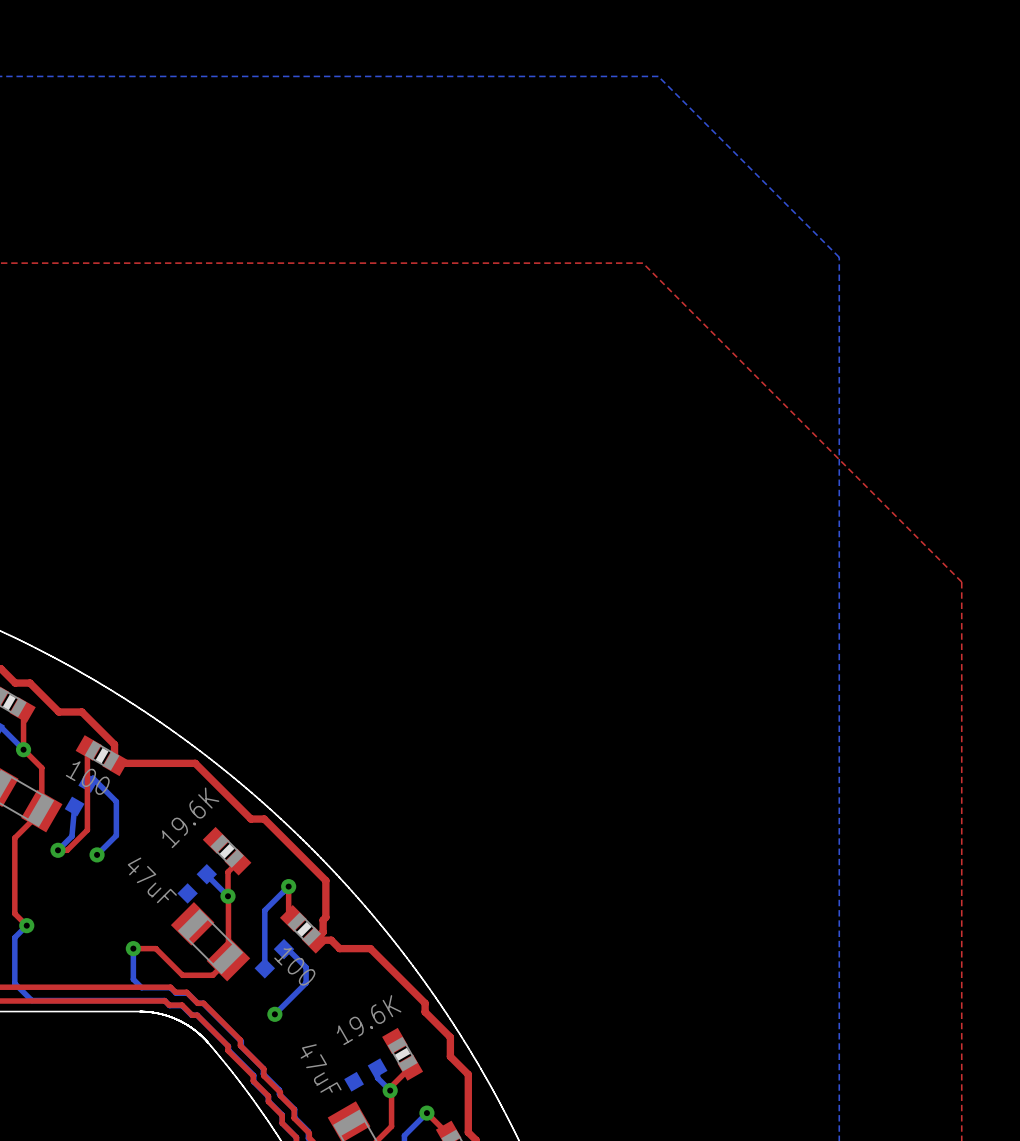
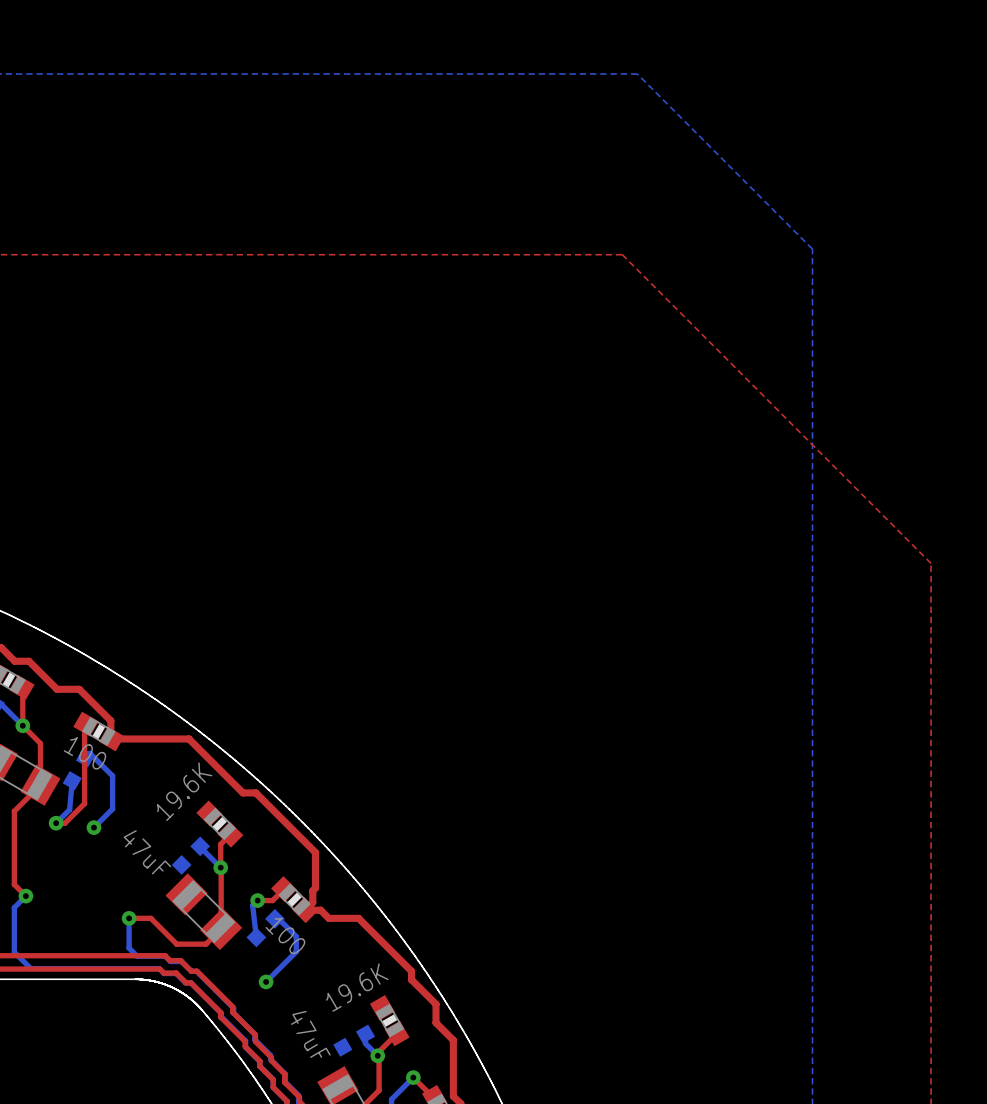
bottom track: (288, 886) (264, 910) (264, 968) -> (257, 900) (252, 905) (256, 937)
top track: (288, 886) (288, 913) (293, 918) -> (257, 900) (272, 900) (284, 889)
via position: (288, 886) -> (257, 900)

